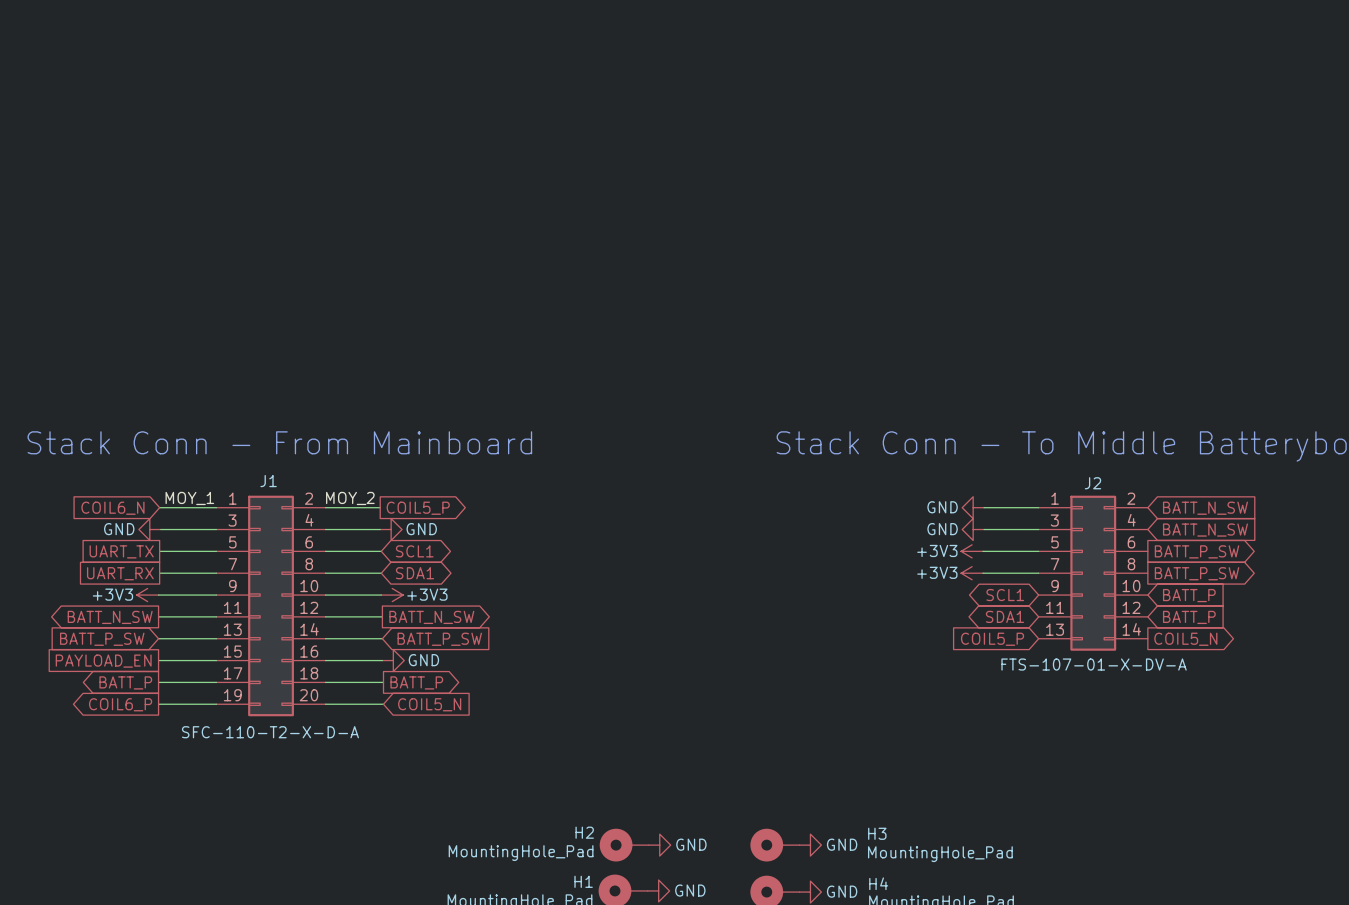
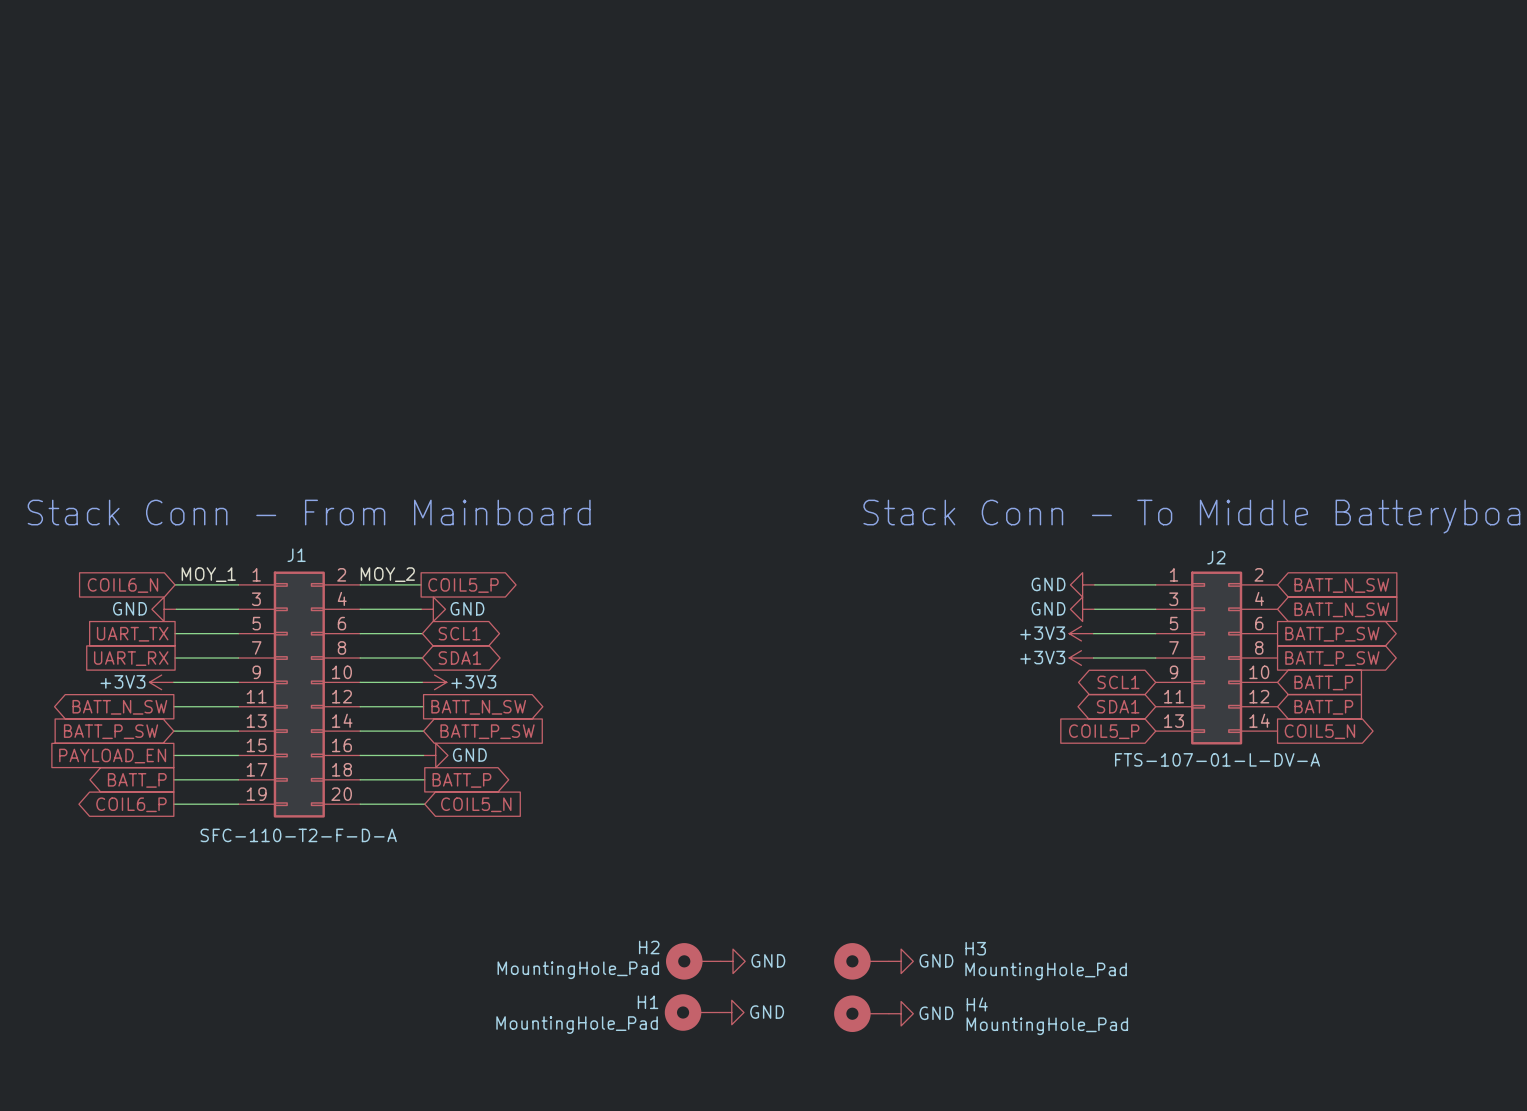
J2 value: FTS-107-01-X-DV-A (1094, 664) -> FTS-107-01-L-DV-A (1217, 759)
J1 value: SFC-110-T2-X-D-A (270, 732) -> SFC-110-T2-F-D-A (298, 835)

